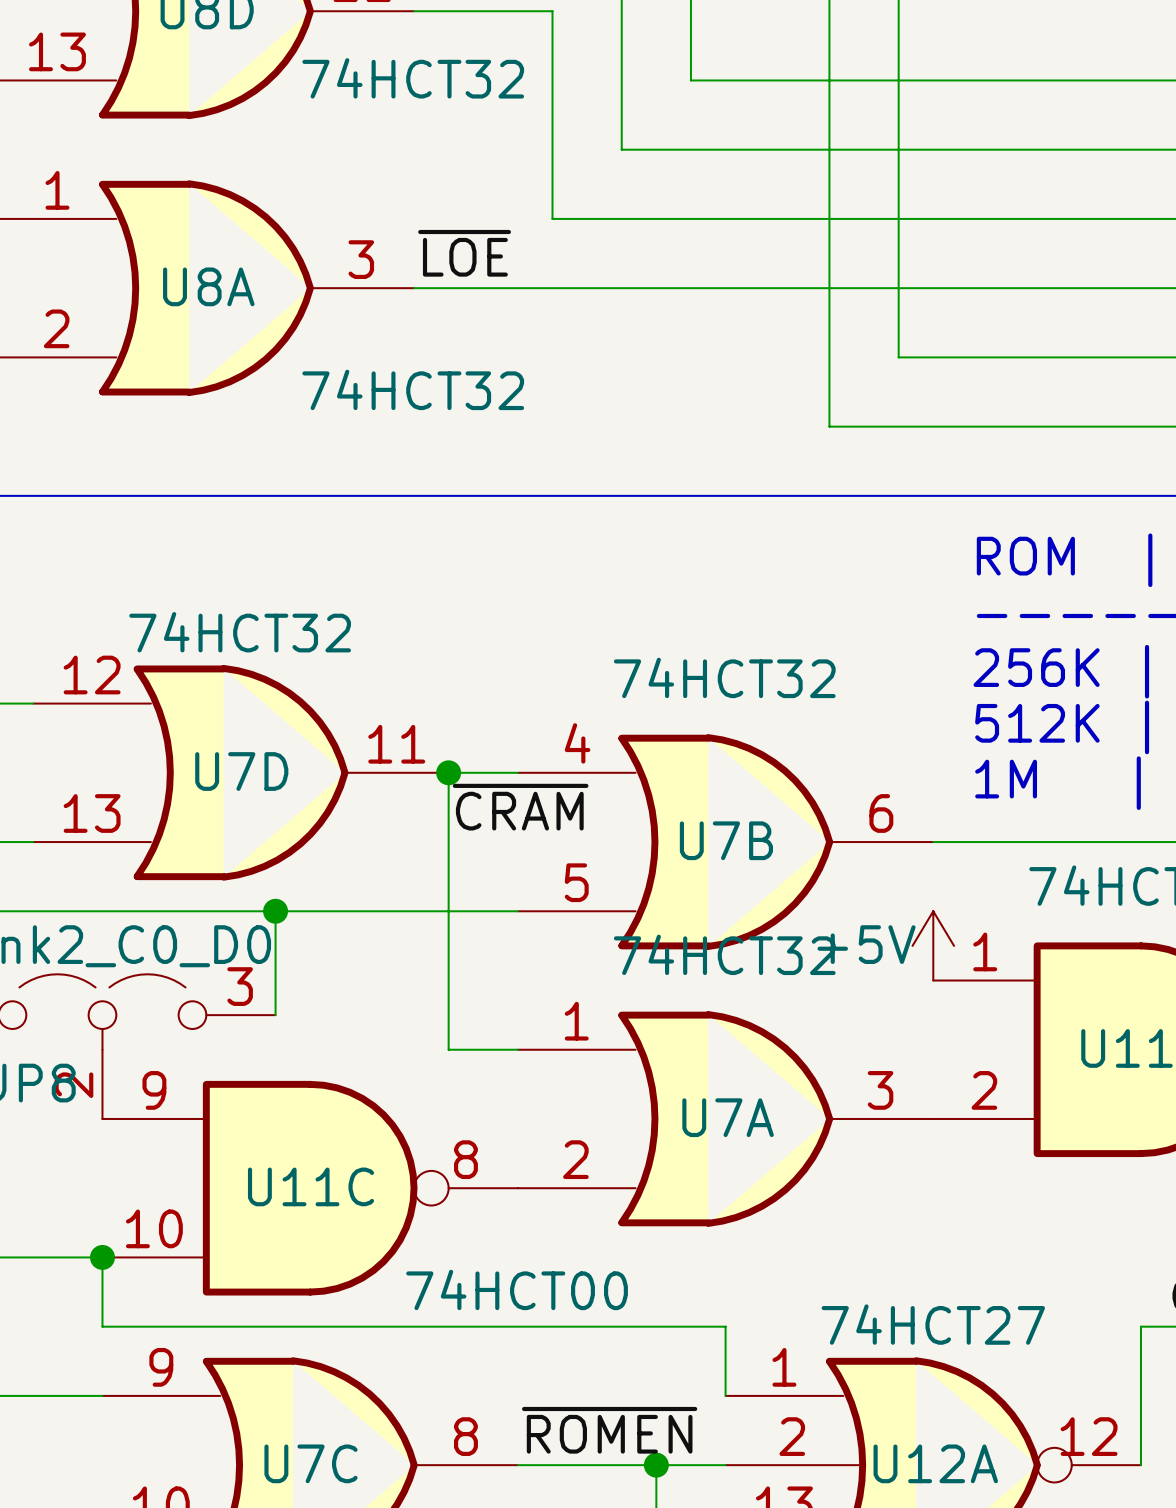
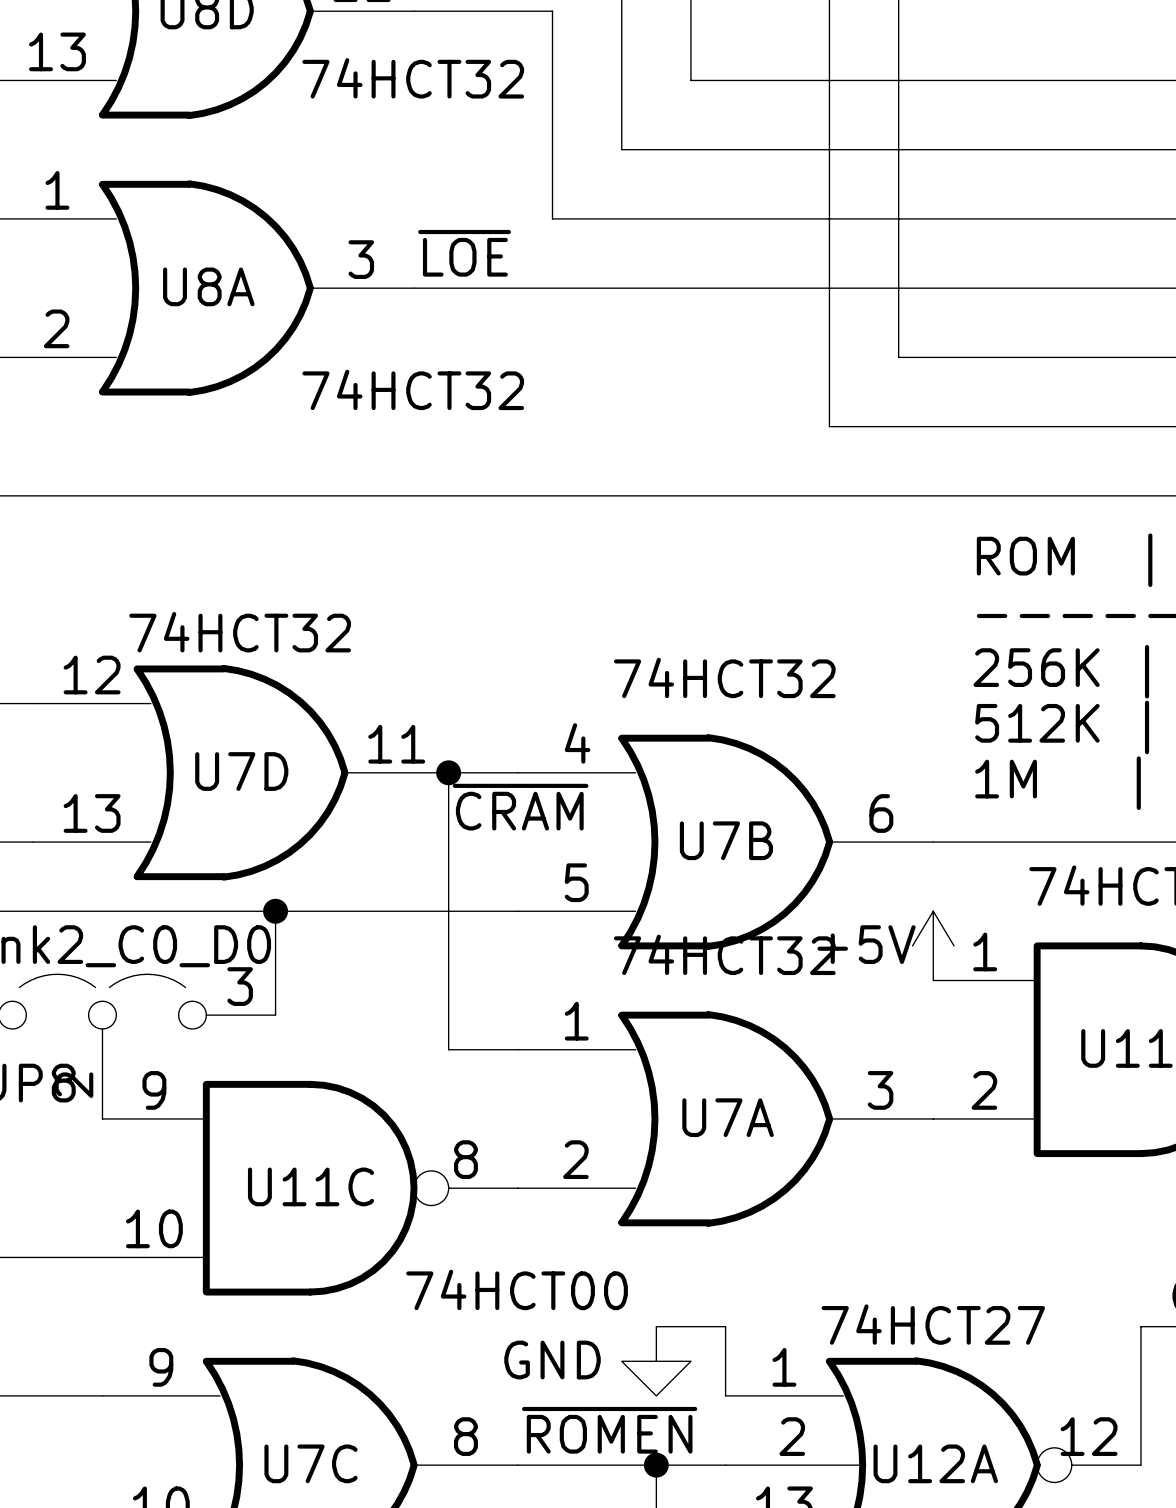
wire: (102, 1257) (102, 1326) (656, 1326) -> none
junction: (102, 1257) -> none
power symbol: none -> GND (656, 1361)

